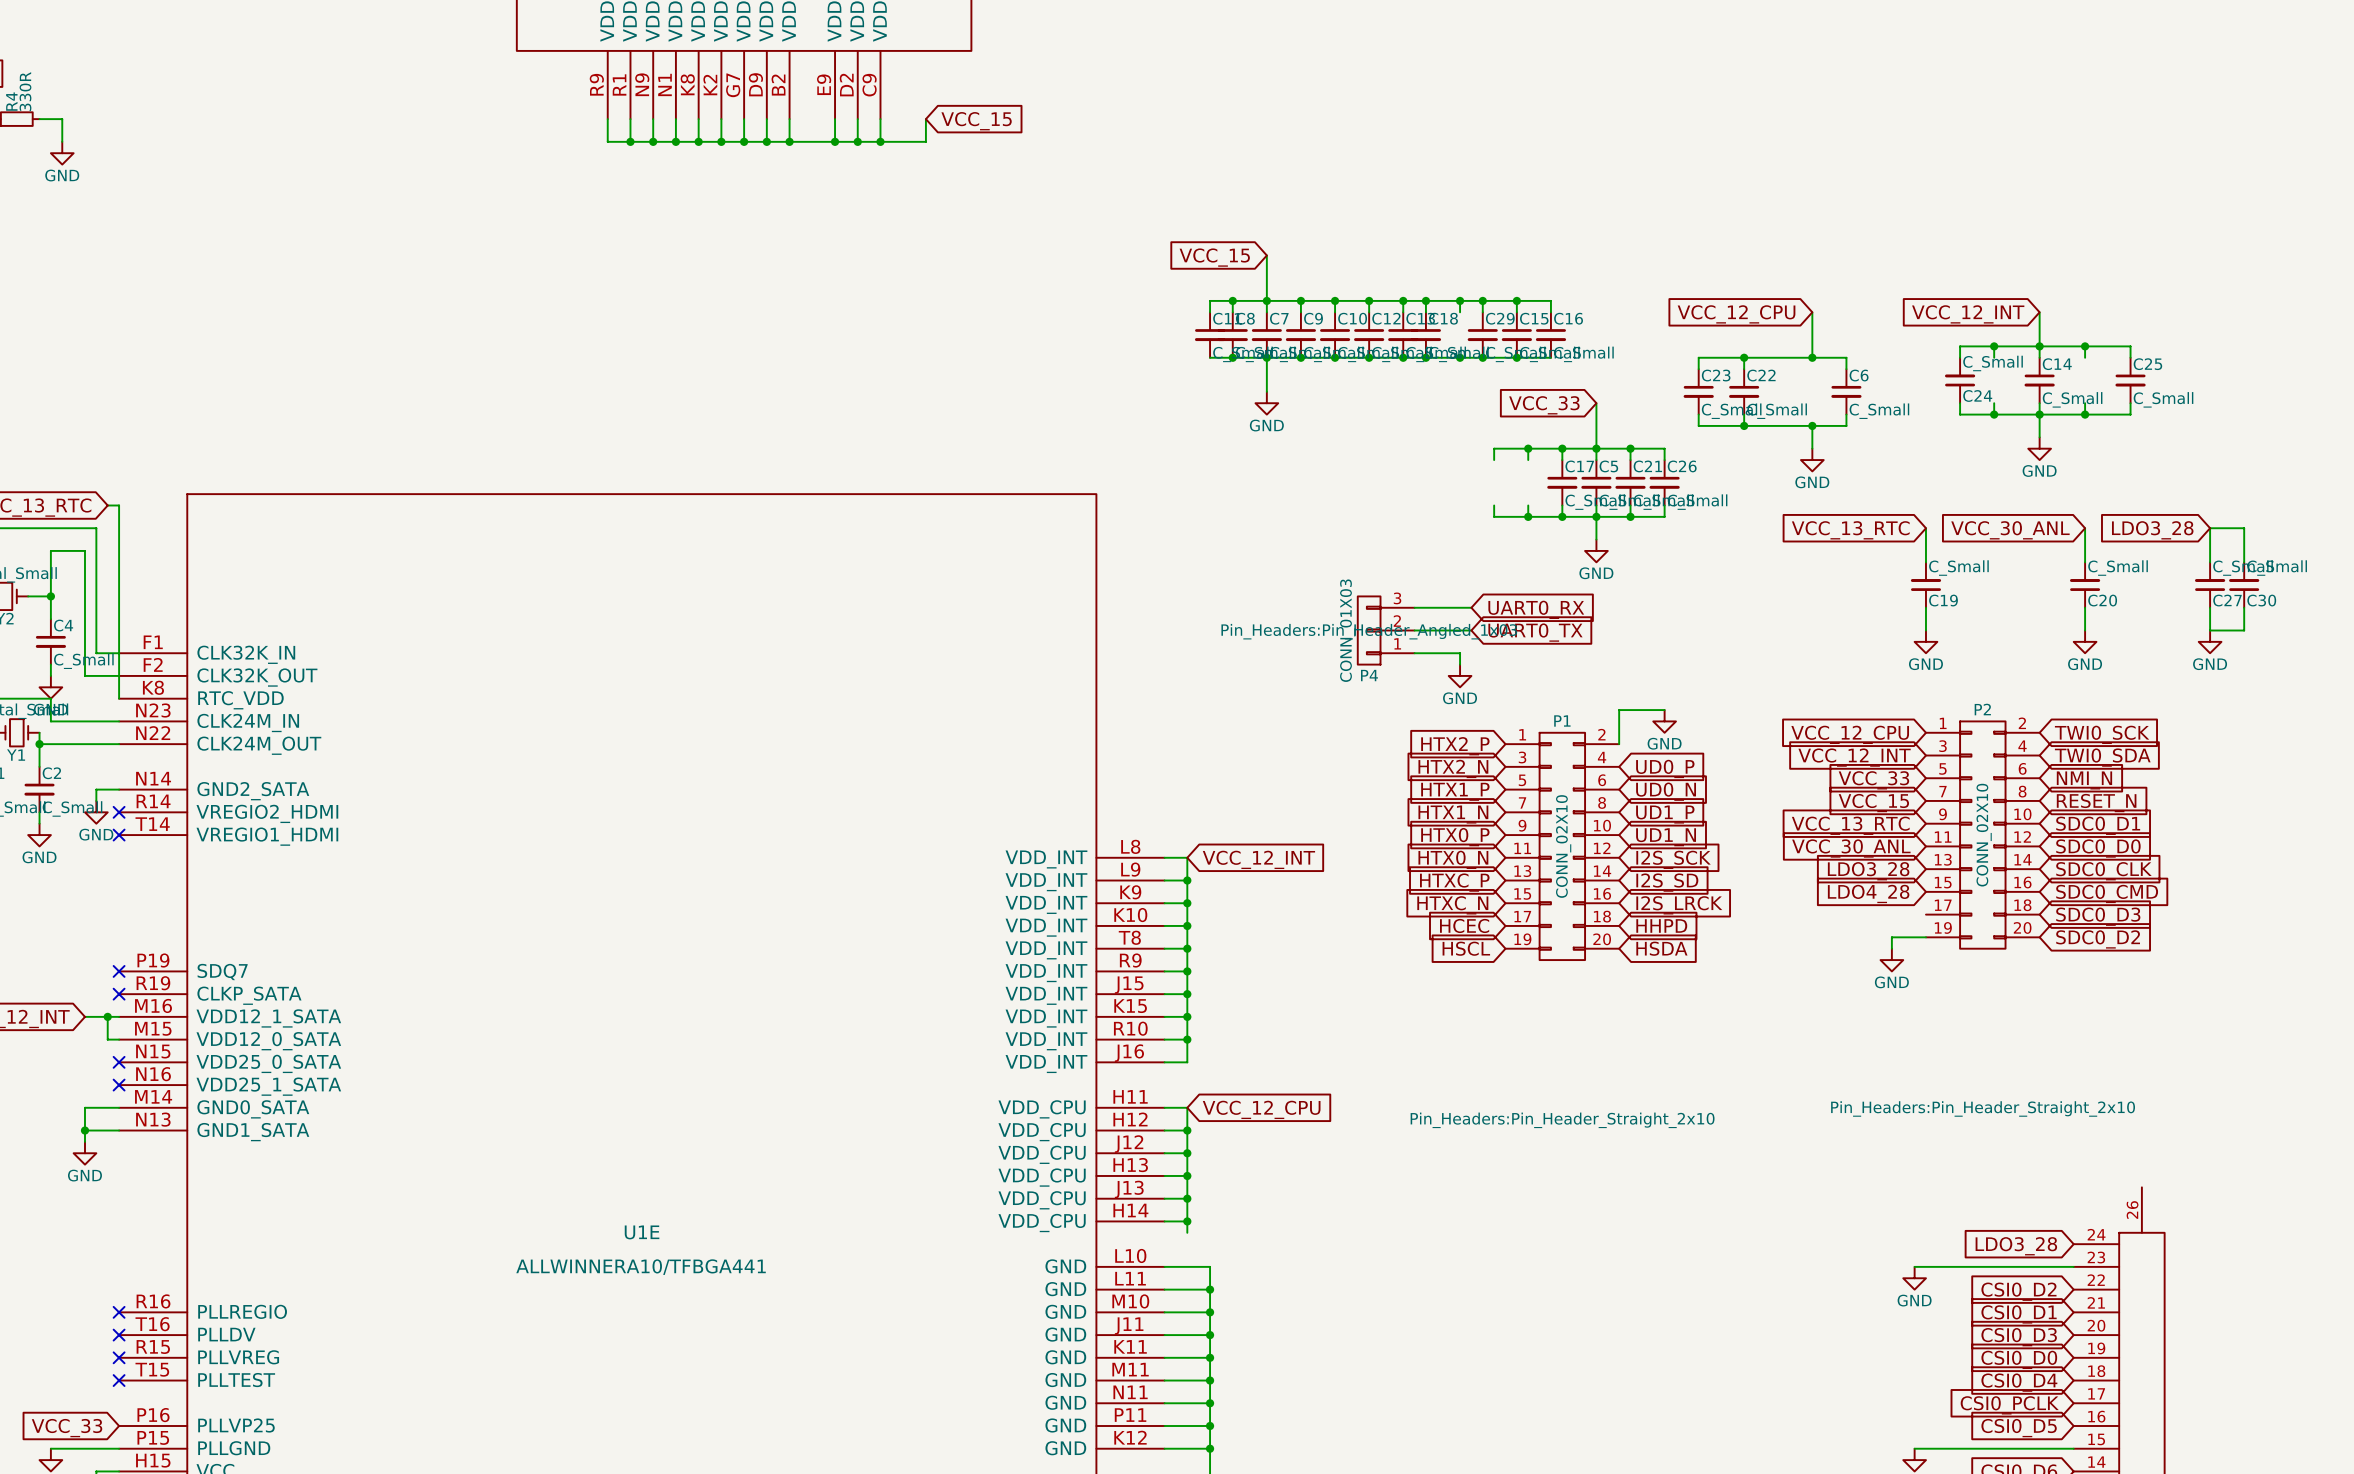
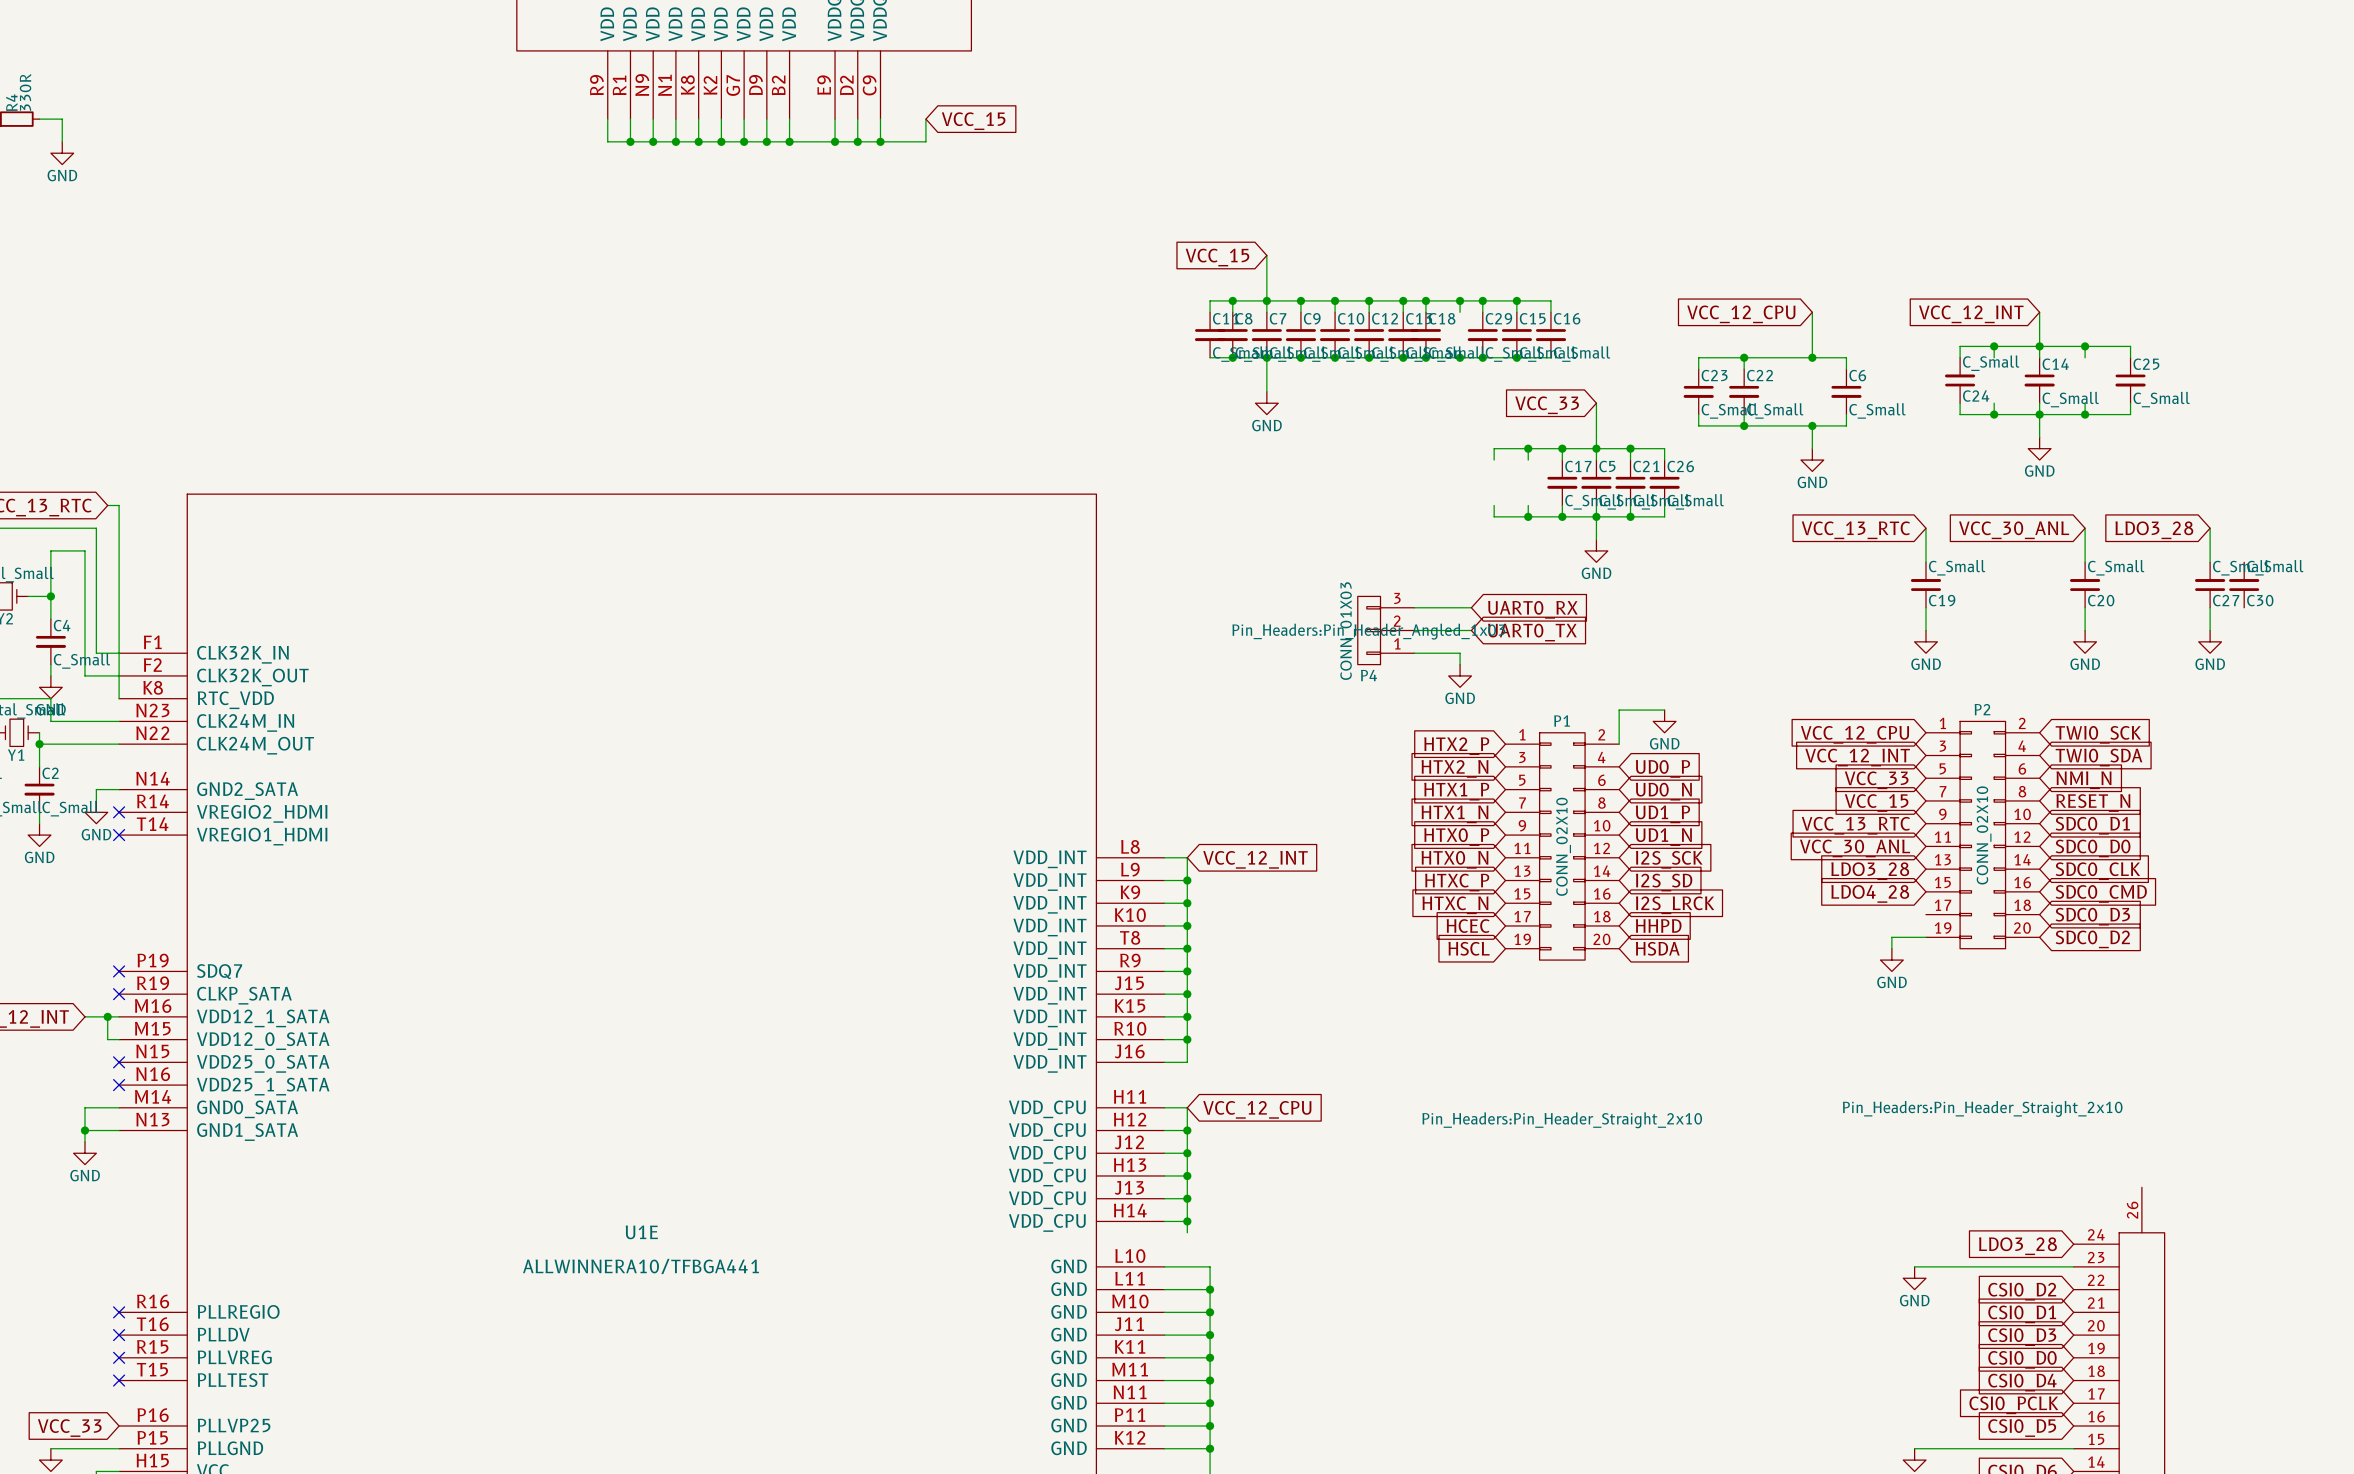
wire: (2210, 528) (2244, 528) (2244, 562) -> none
wire: (2244, 607) (2244, 630) (2210, 630) -> none

